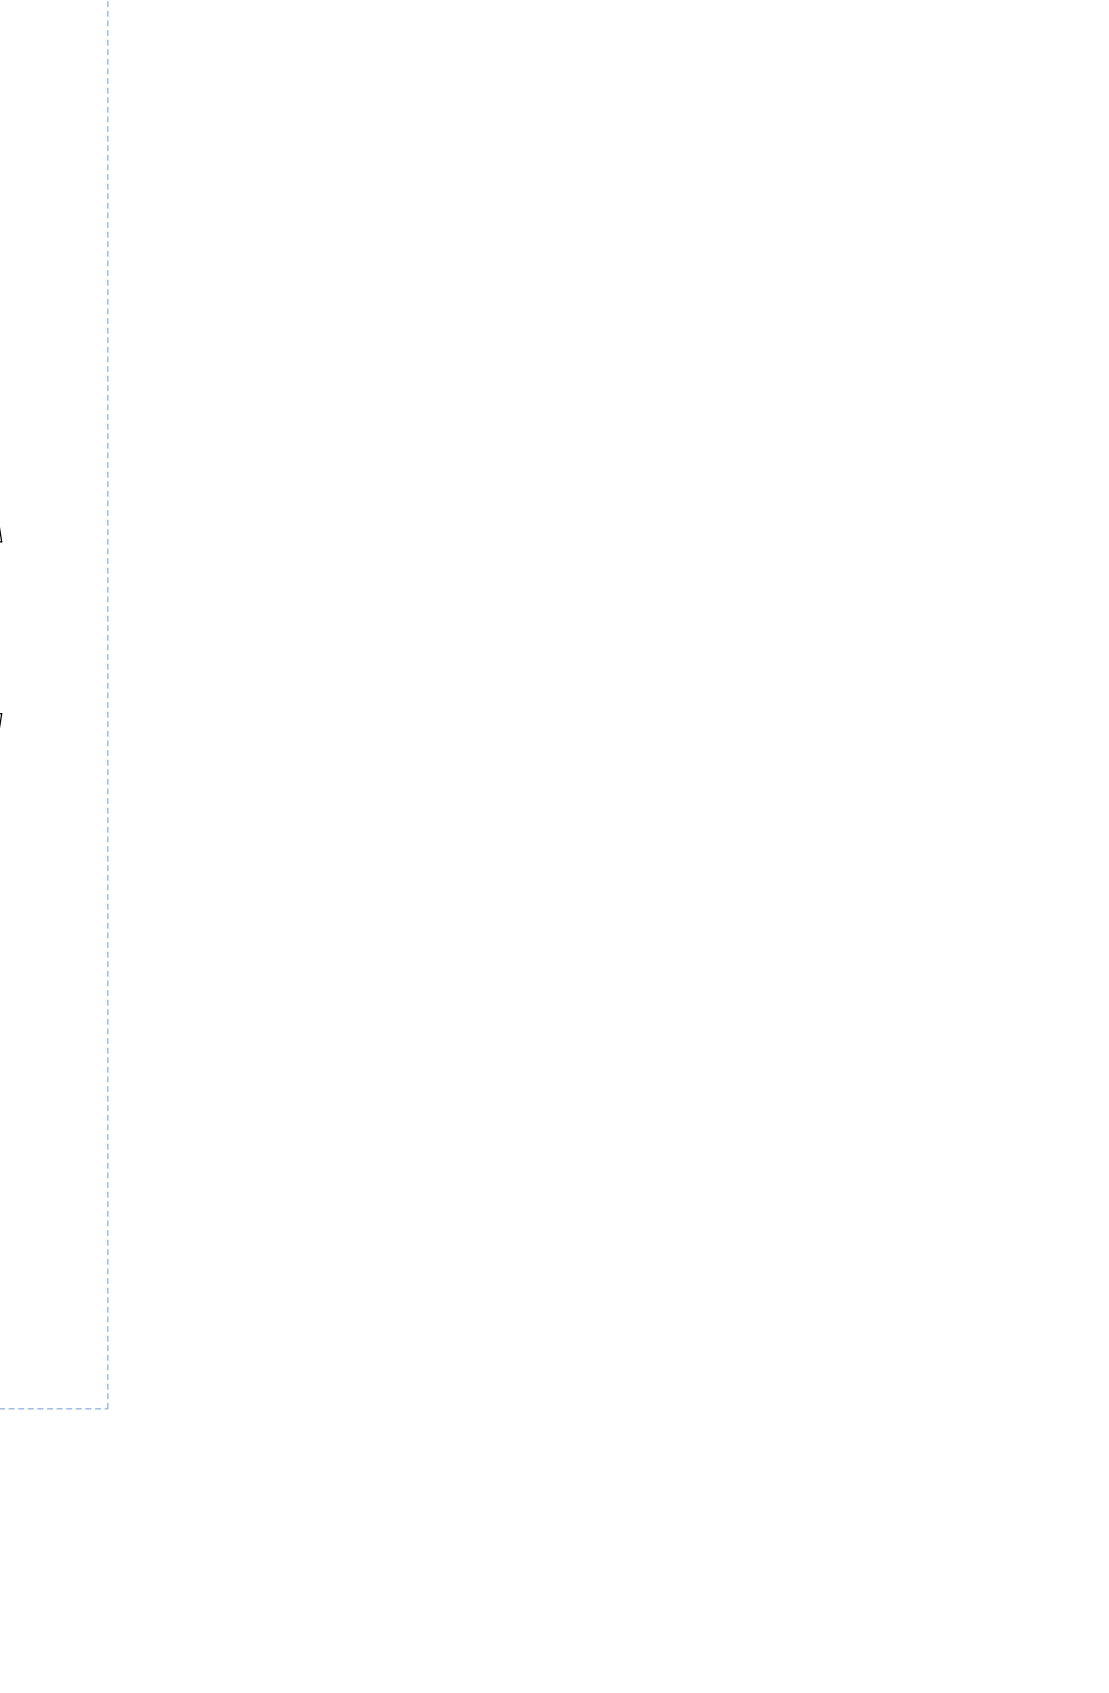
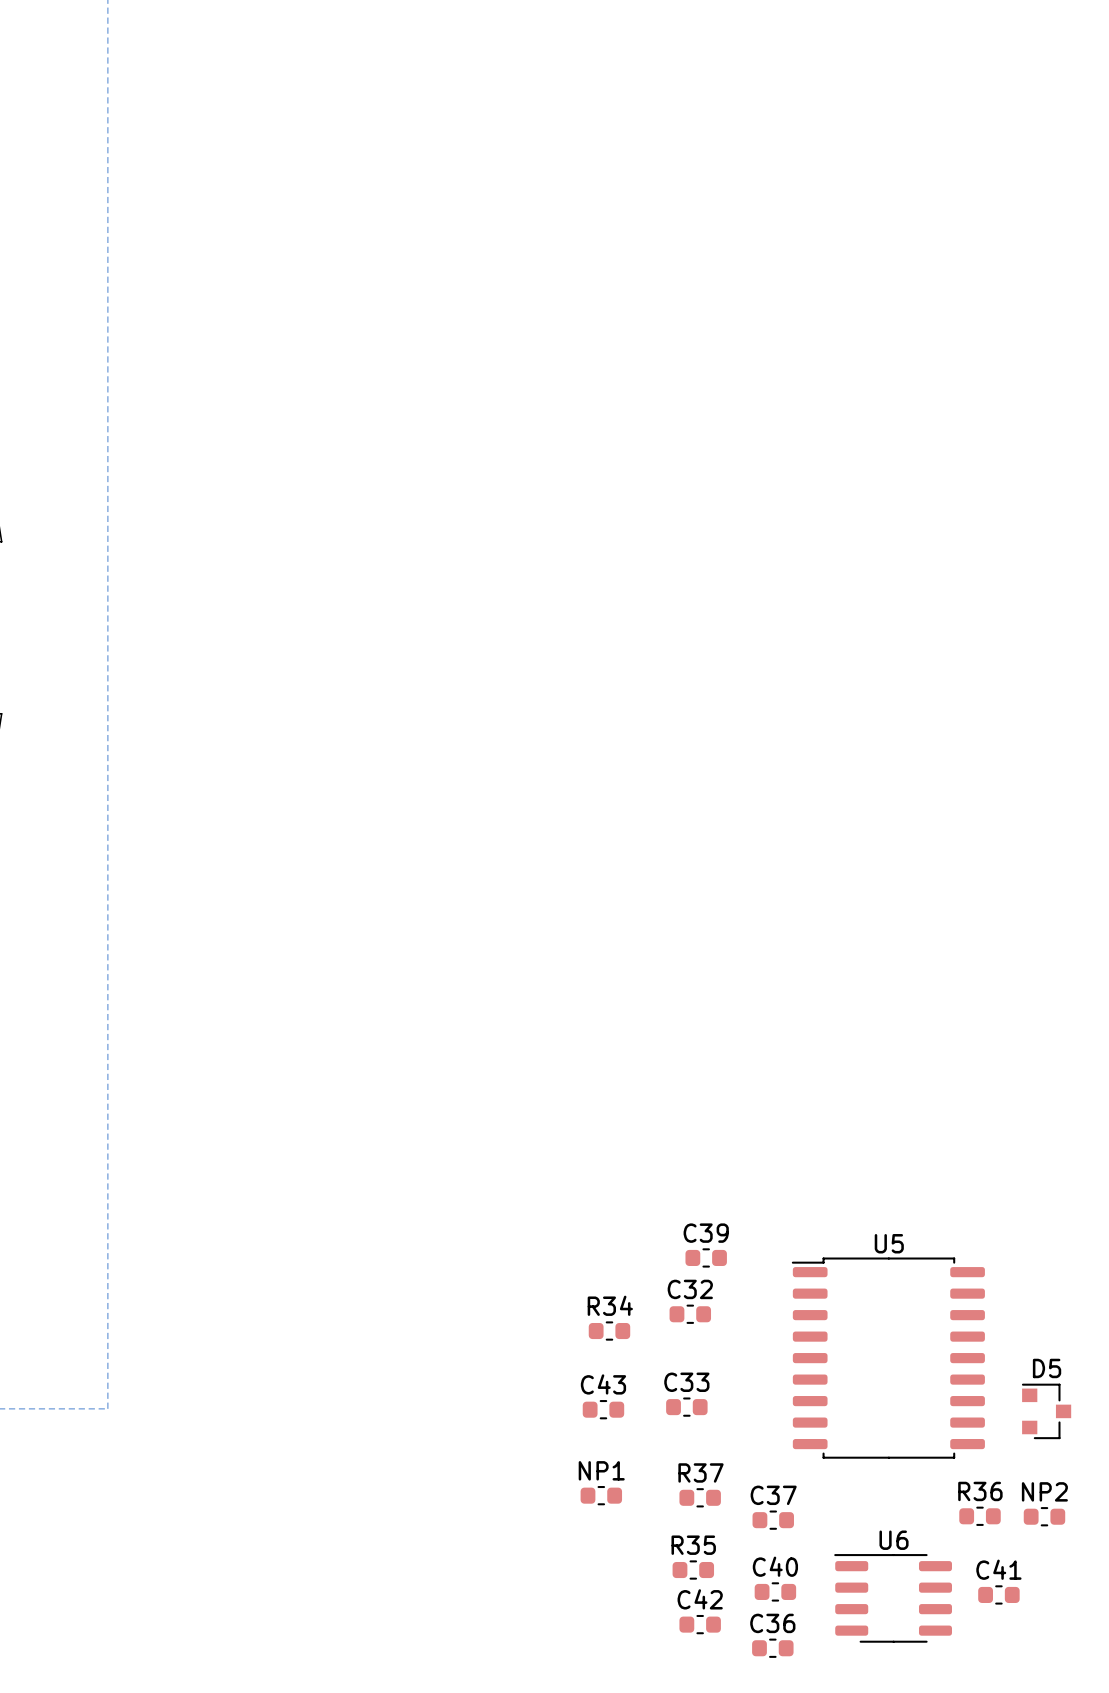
C39: none -> (706, 1257)
C32: none -> (690, 1314)
R34: none -> (609, 1331)
U5: none -> (888, 1358)
C33: none -> (686, 1407)
C43: none -> (603, 1409)
D5: none -> (1046, 1411)
NP1: none -> (601, 1495)
R37: none -> (700, 1497)
R36: none -> (980, 1516)
NP2: none -> (1044, 1516)
C37: none -> (773, 1520)
R35: none -> (693, 1570)
C40: none -> (775, 1591)
C41: none -> (998, 1594)
U6: none -> (893, 1598)
C42: none -> (700, 1624)
C36: none -> (772, 1648)

